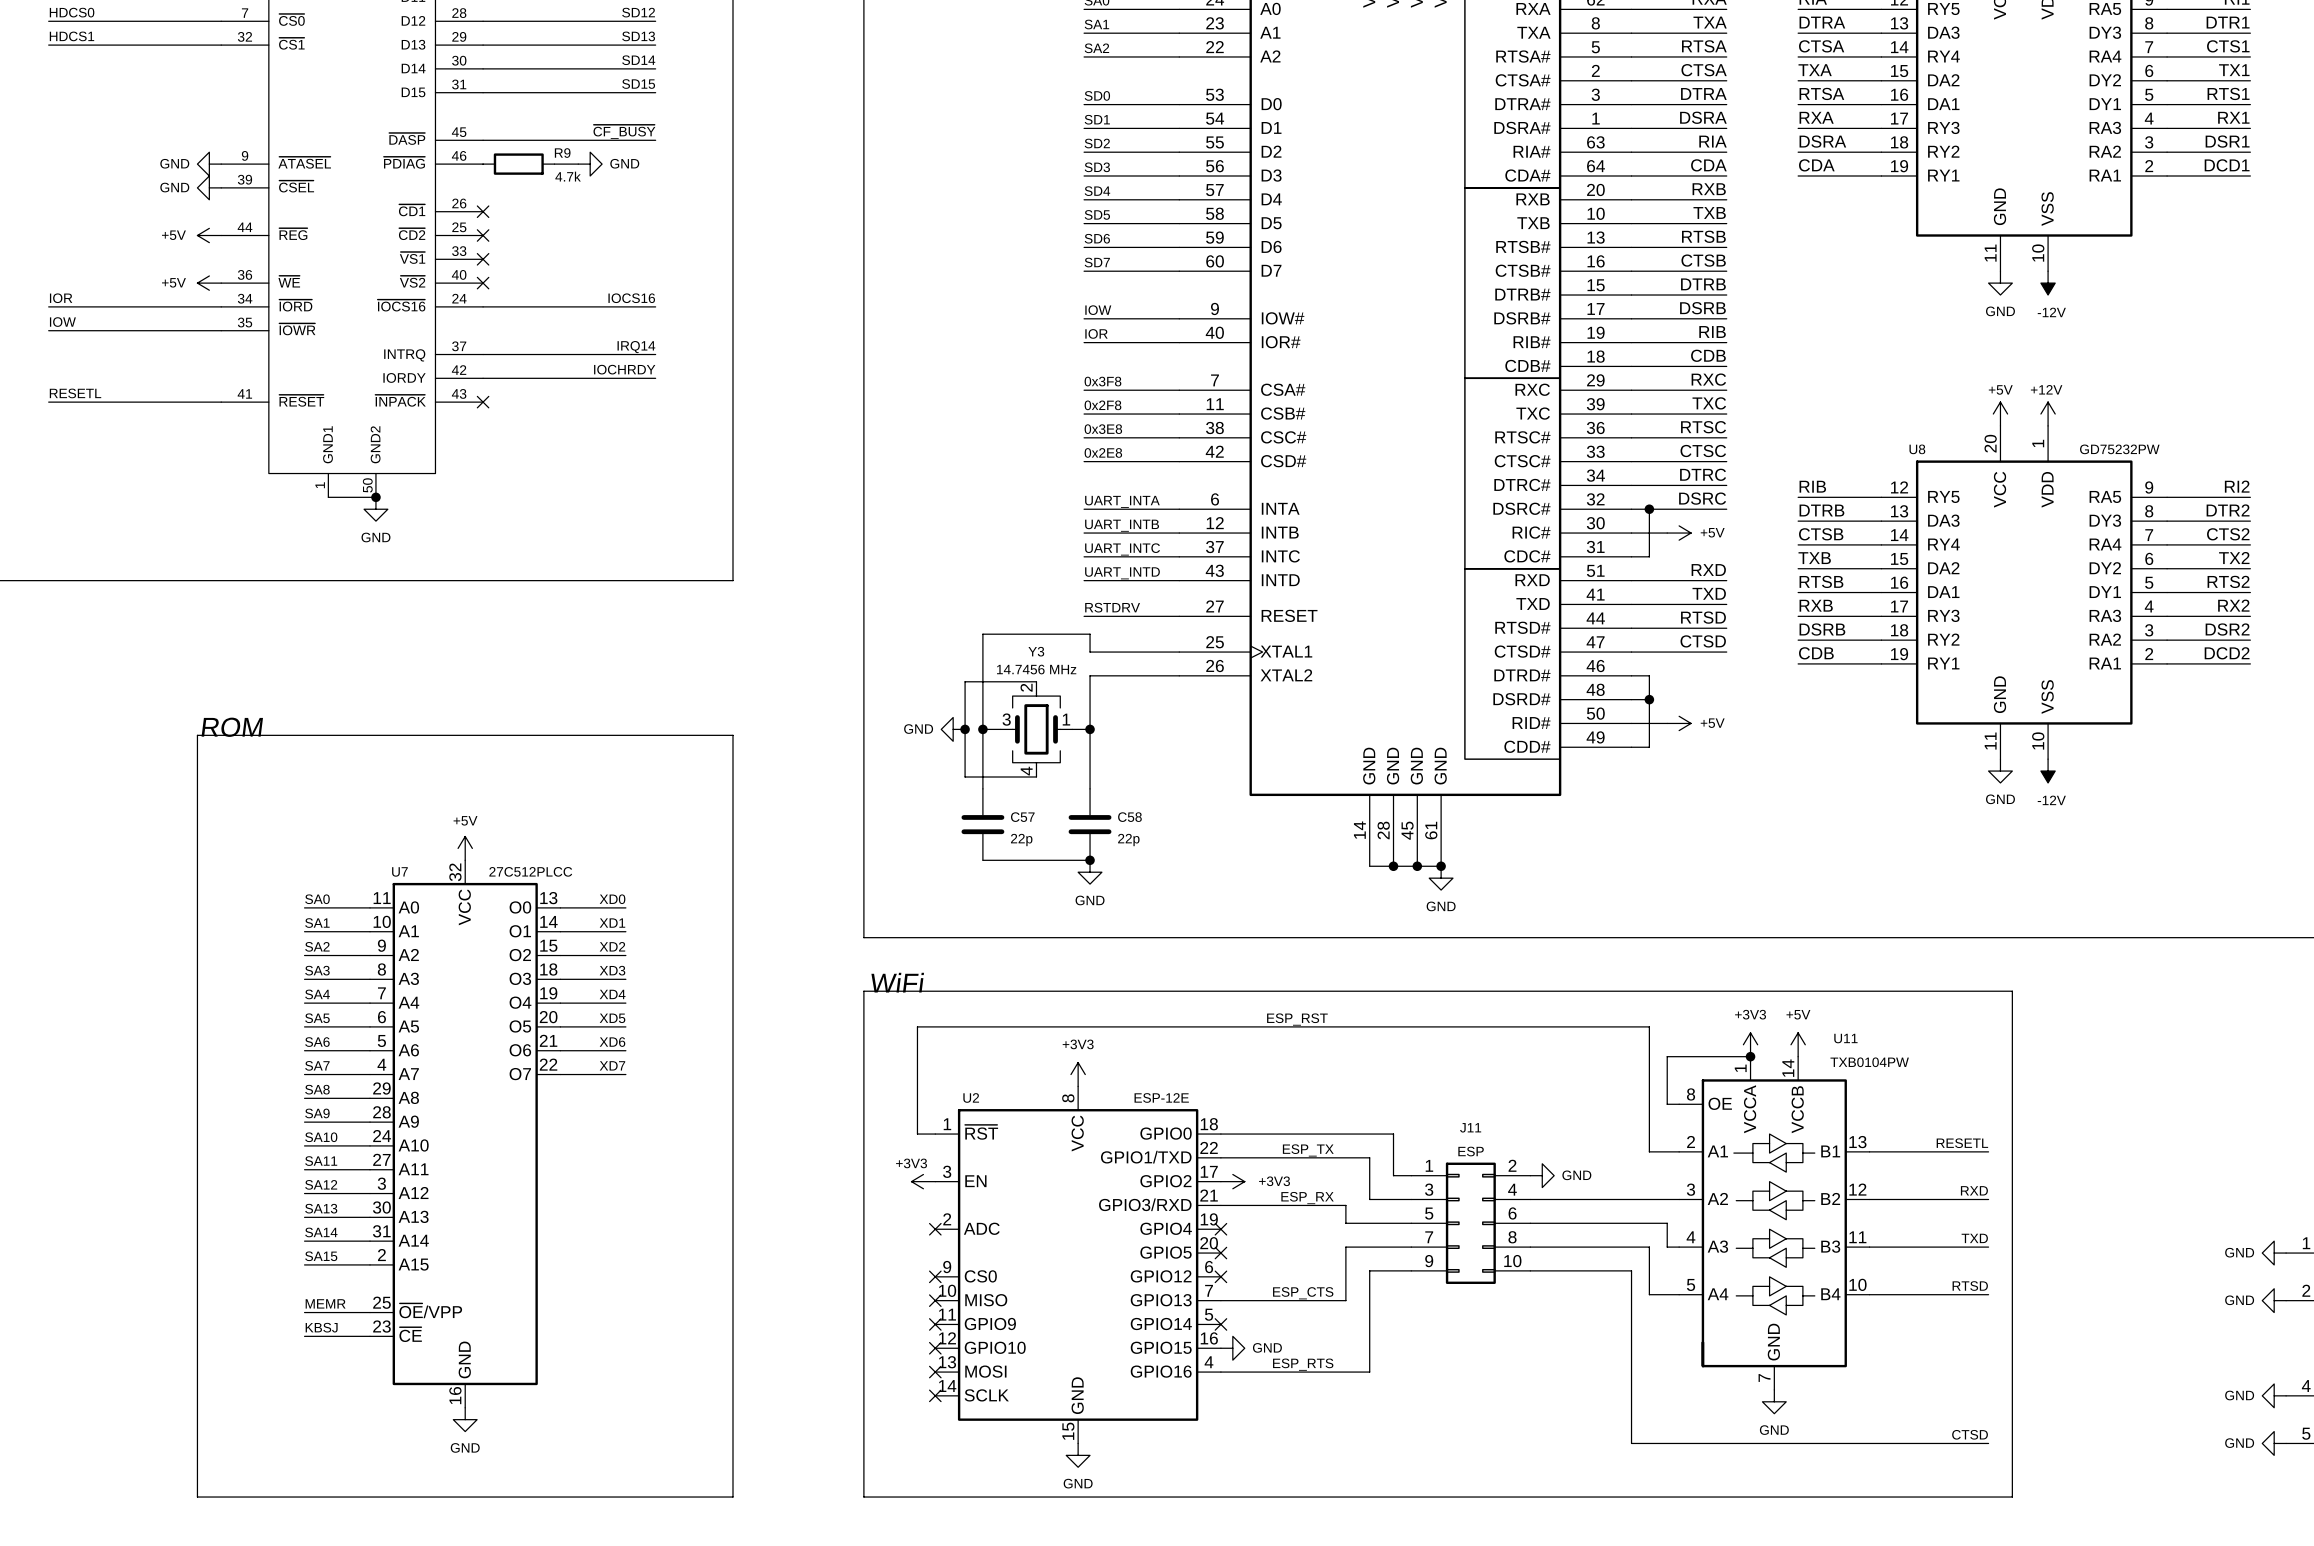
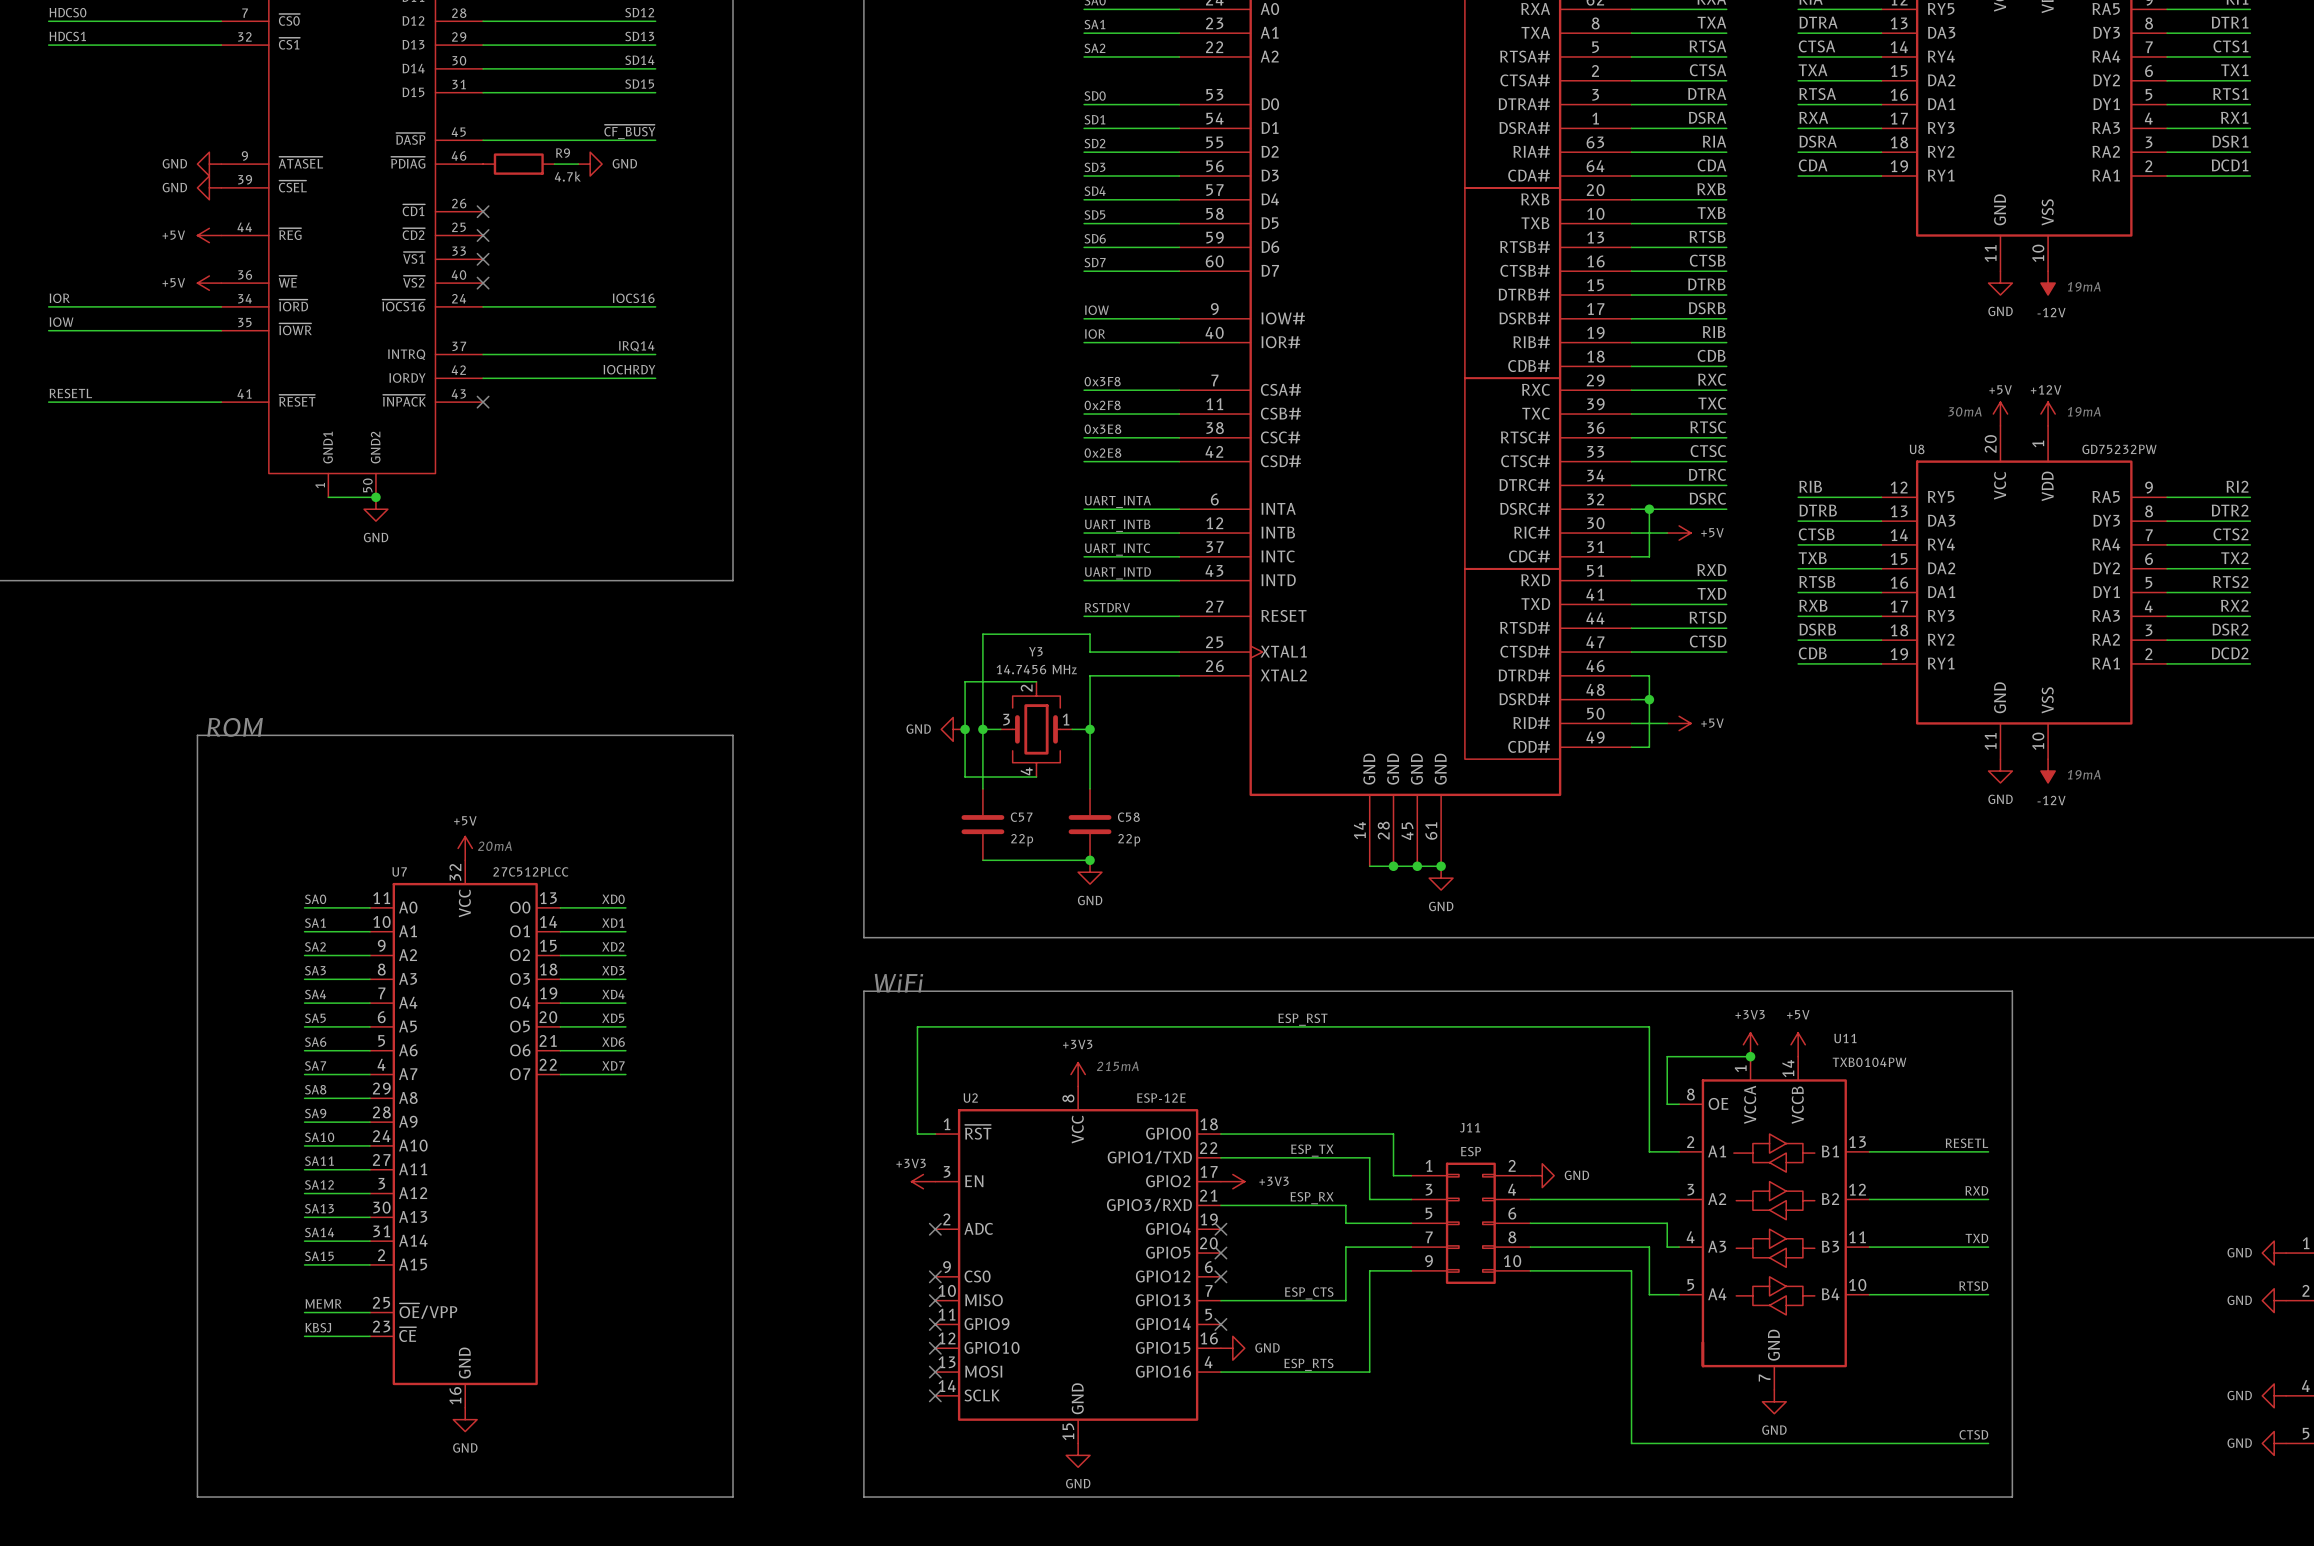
text: none -> 19mA (2084, 286)
text: none -> 30mA (1964, 411)
text: none -> 19mA (2084, 411)
text: none -> 19mA (2084, 774)
text: none -> 20mA (494, 846)
text: none -> 215mA (1117, 1066)

